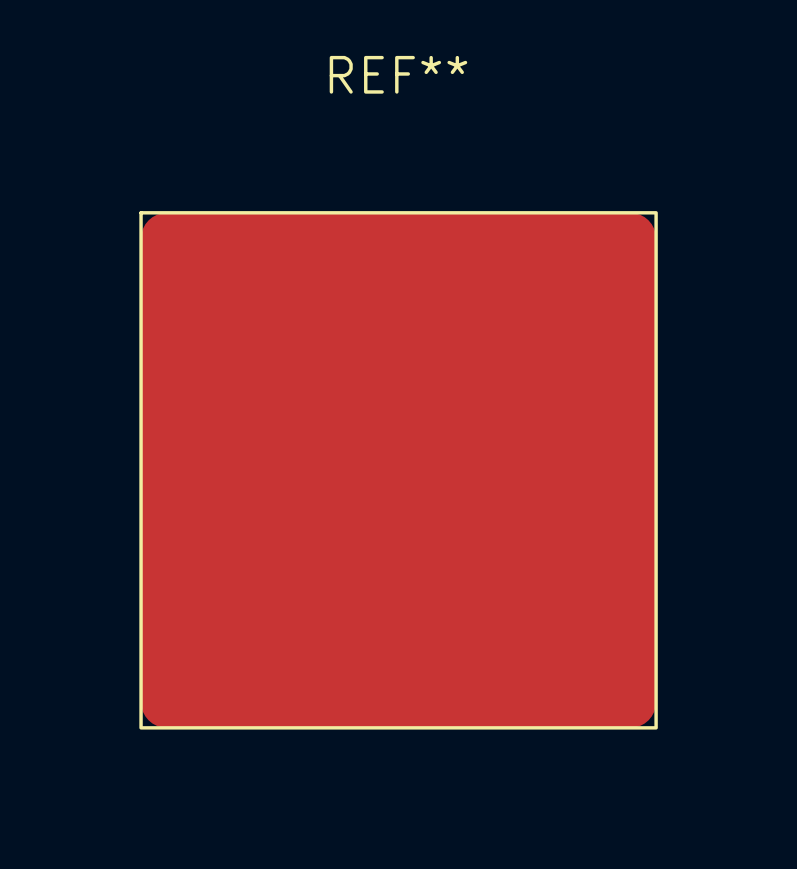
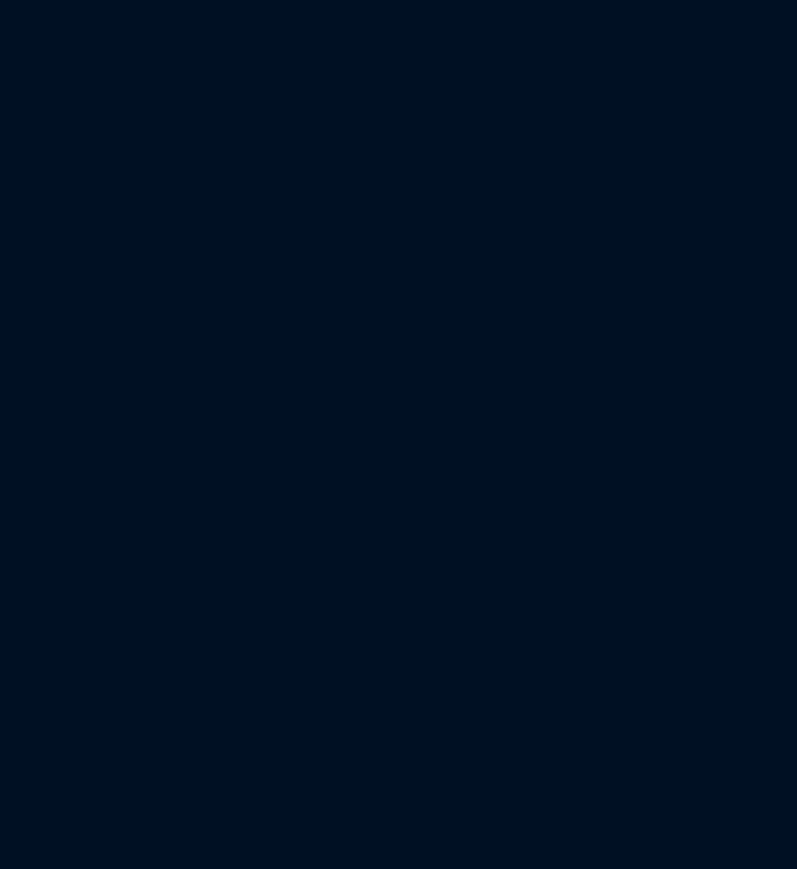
REF**: (398, 470) -> none

